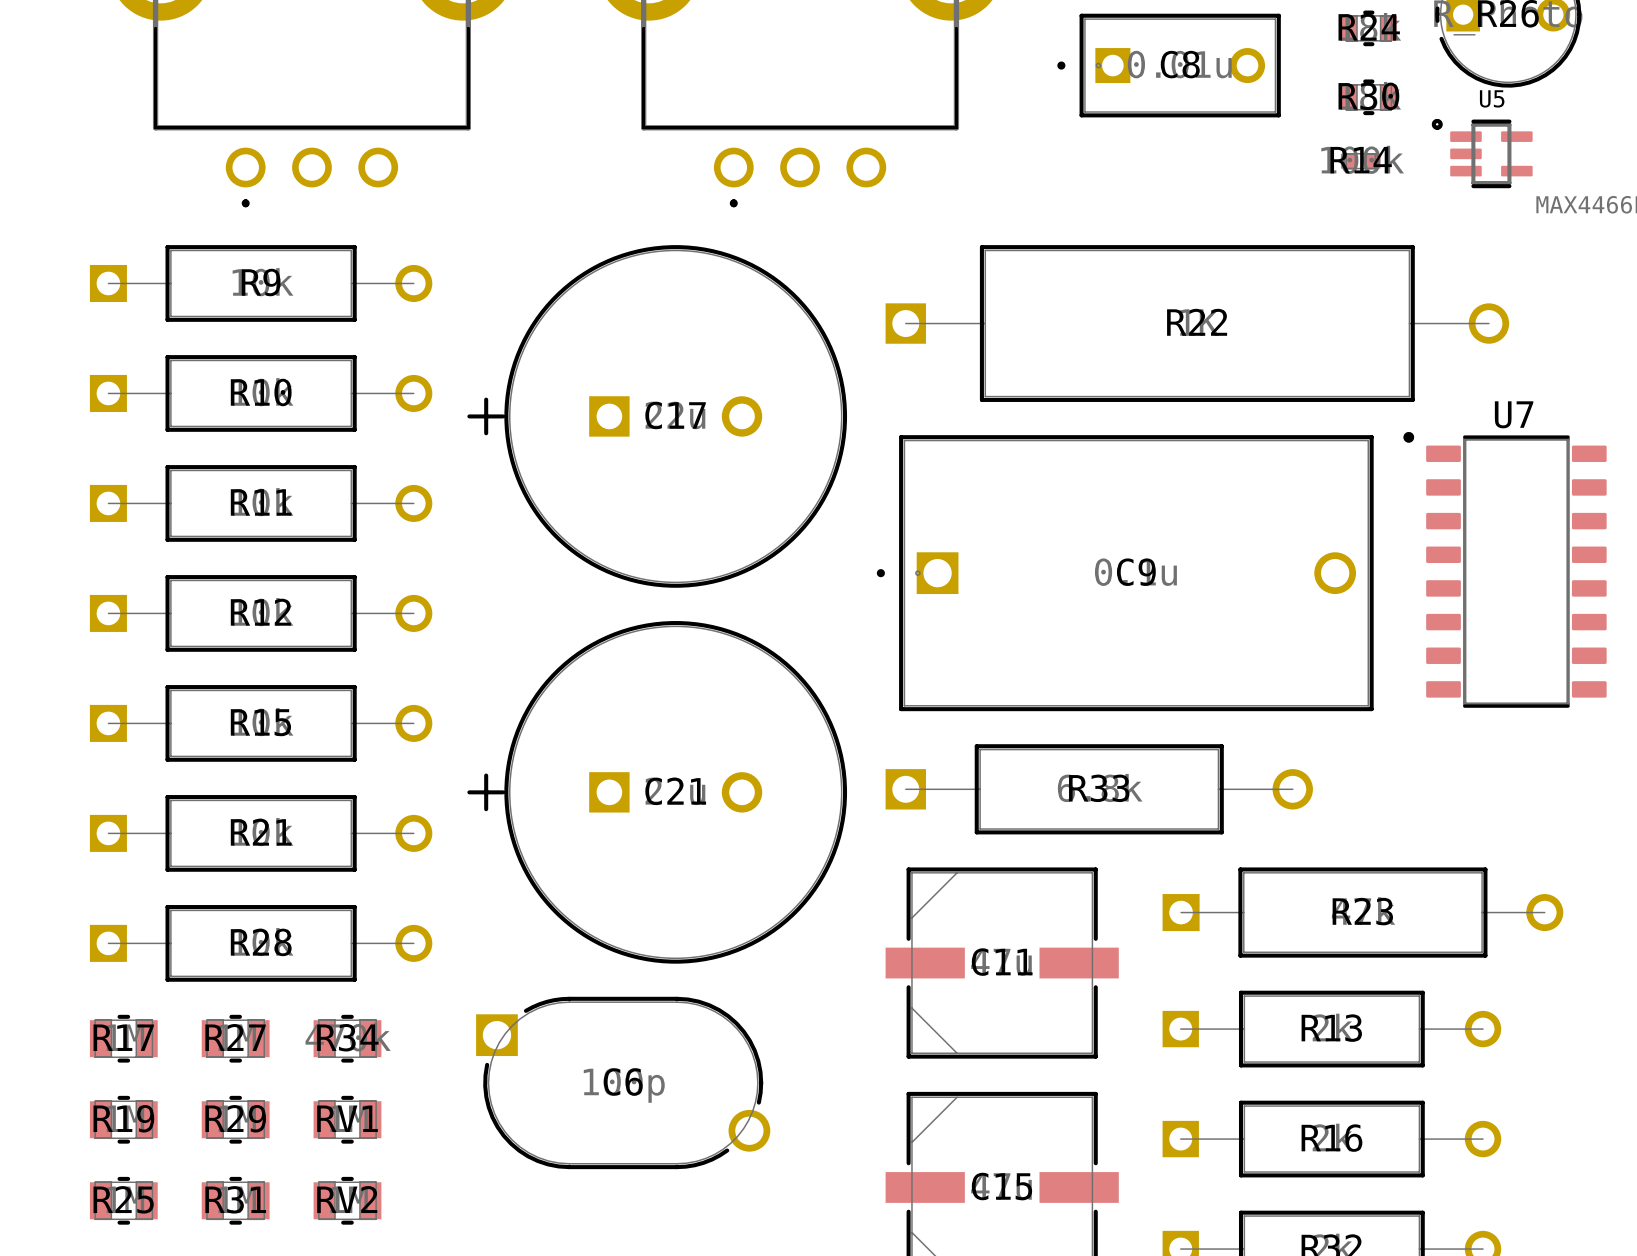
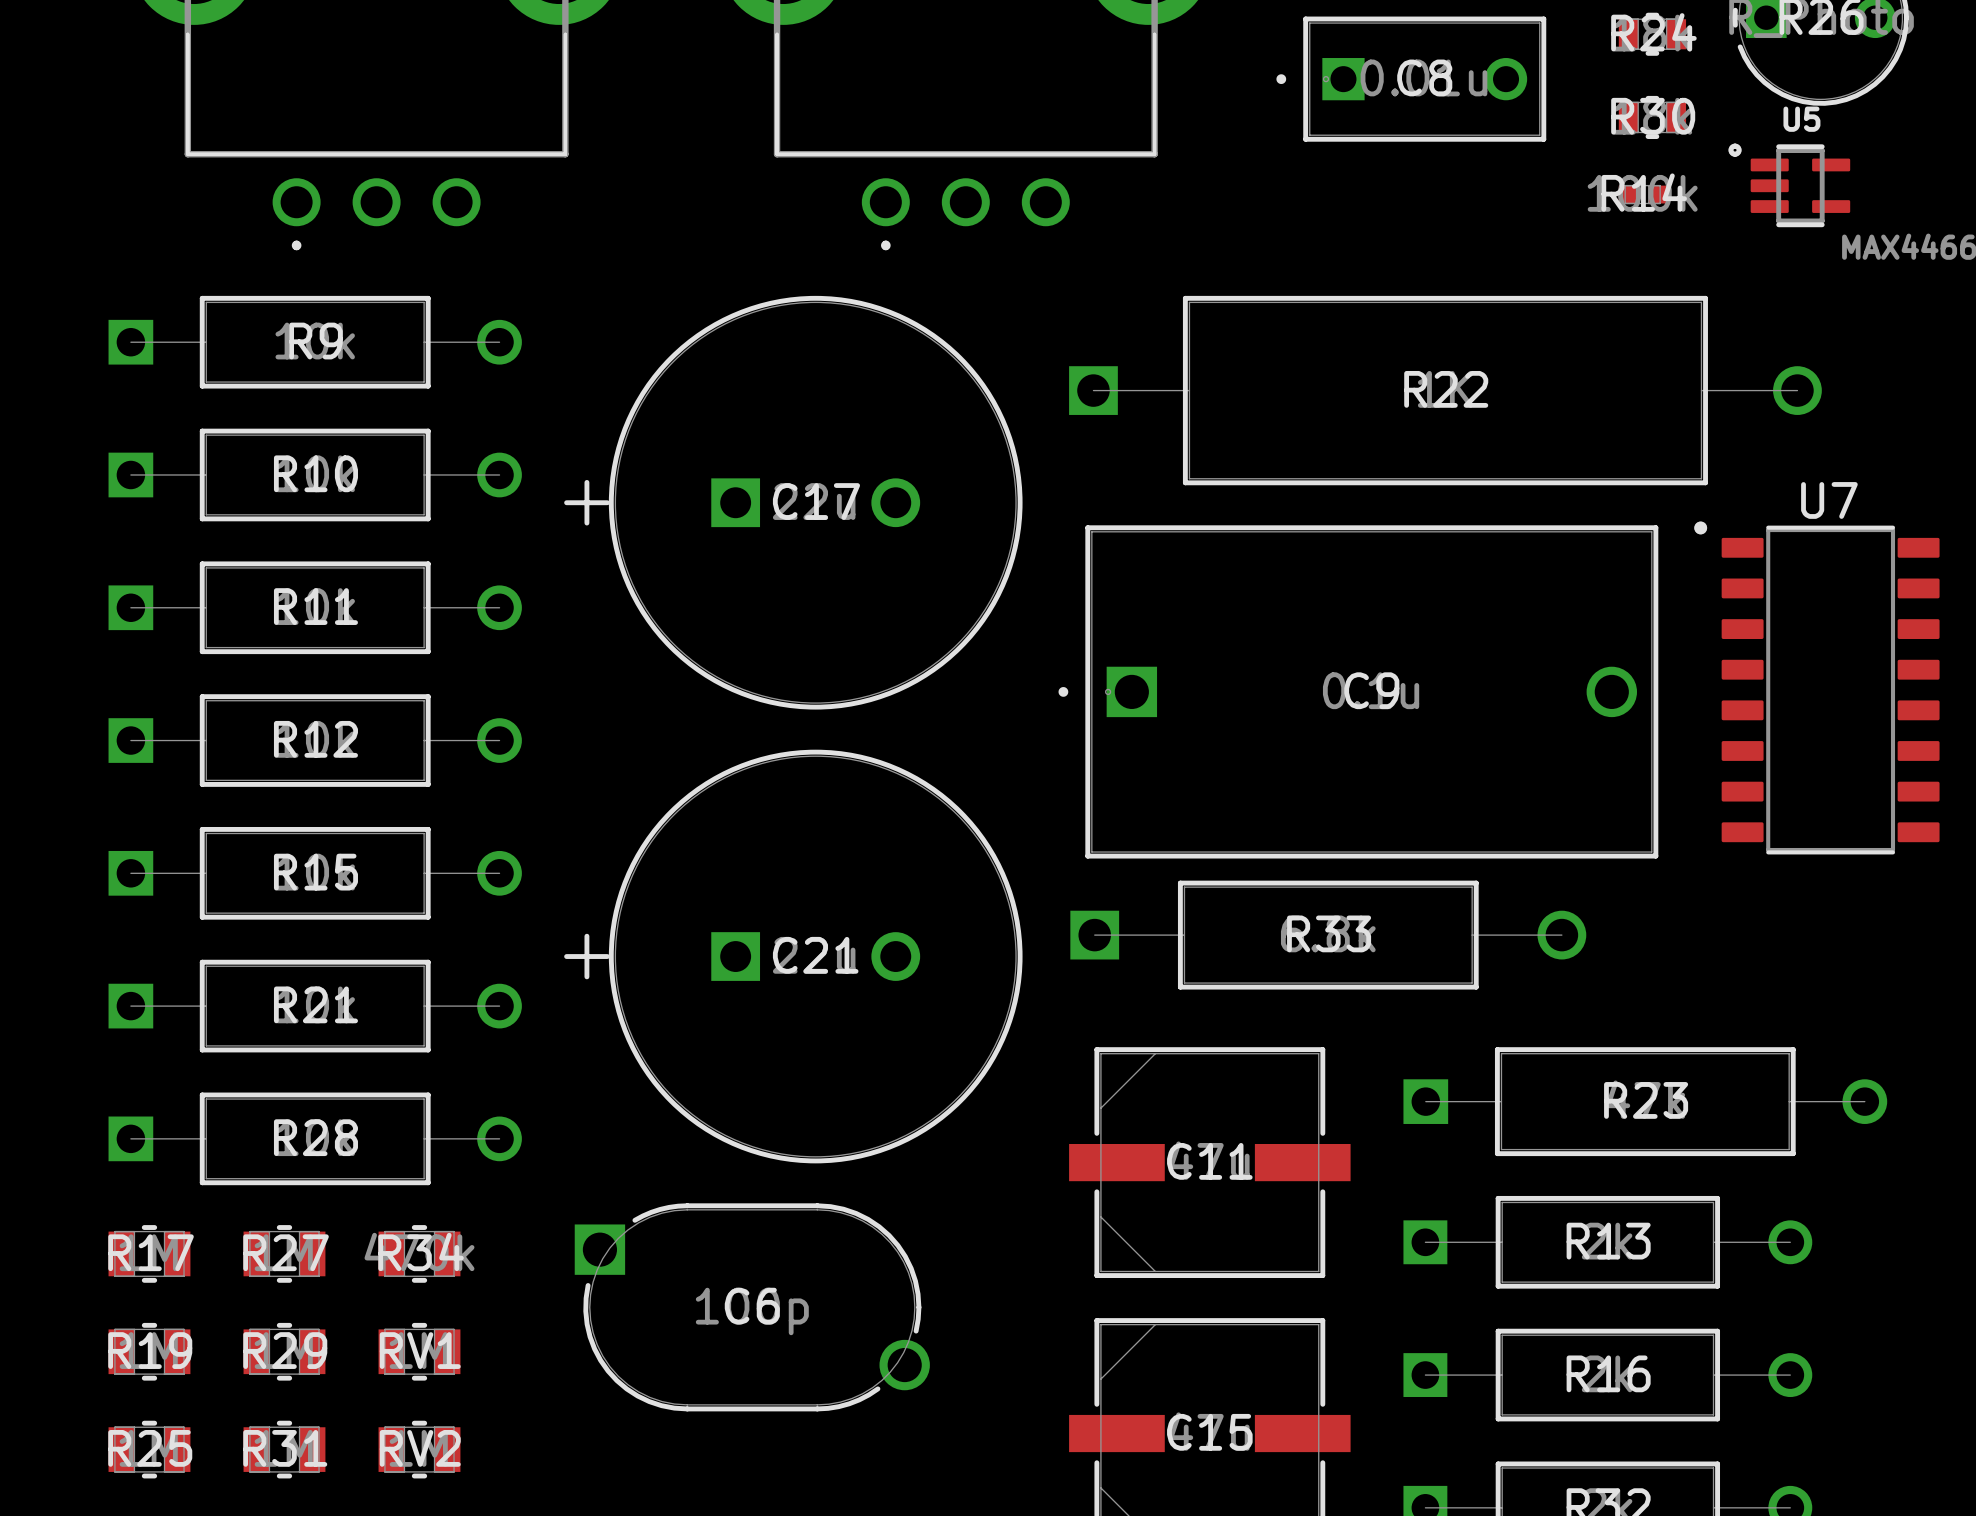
R33 position: (1099, 789) -> (1328, 935)

